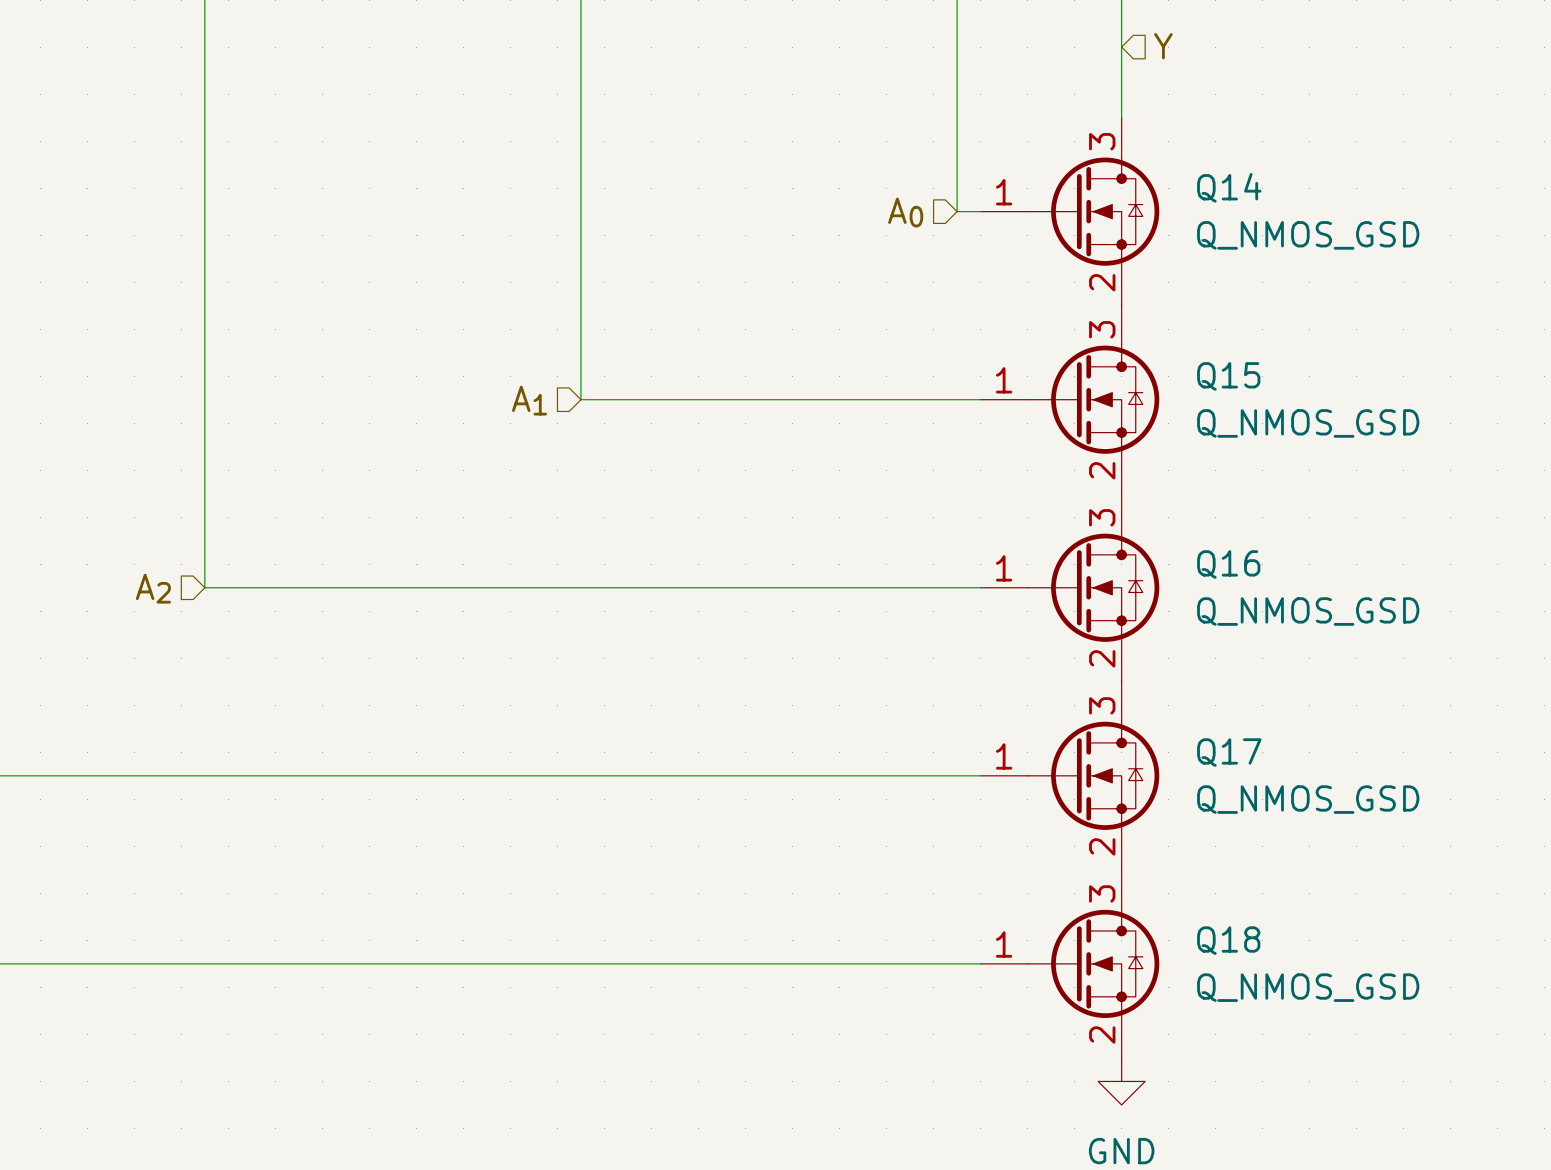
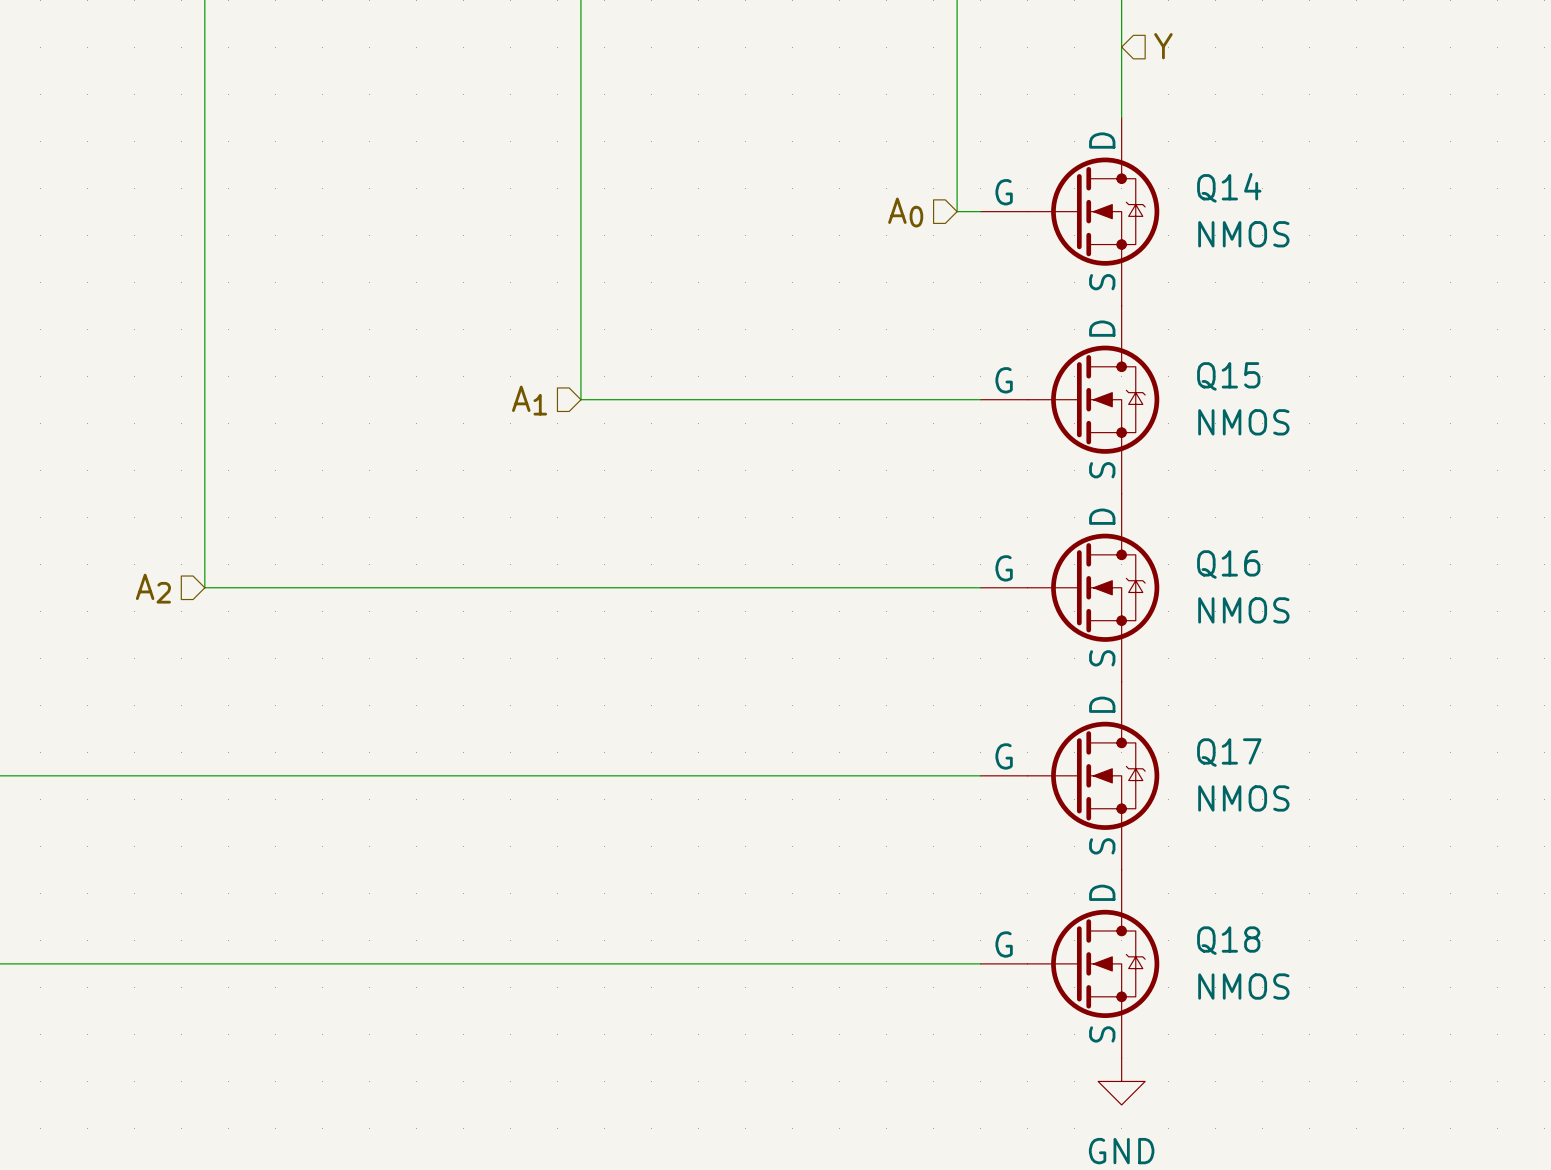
Q14 symbol: [980, 117, 1160, 306] -> [980, 117, 1160, 306]
Q14 value: Q_NMOS_GSD (1308, 235) -> NMOS (1243, 234)
Q15 symbol: [980, 305, 1160, 494] -> [980, 305, 1160, 494]
Q15 value: Q_NMOS_GSD (1308, 423) -> NMOS (1243, 422)
Q16 symbol: [980, 493, 1160, 682] -> [980, 493, 1160, 682]
Q16 value: Q_NMOS_GSD (1308, 611) -> NMOS (1243, 610)
Q17 symbol: [980, 681, 1160, 870] -> [980, 681, 1160, 870]
Q17 value: Q_NMOS_GSD (1308, 799) -> NMOS (1243, 798)
Q18 symbol: [980, 869, 1160, 1058] -> [980, 869, 1160, 1058]
Q18 value: Q_NMOS_GSD (1308, 987) -> NMOS (1243, 986)

